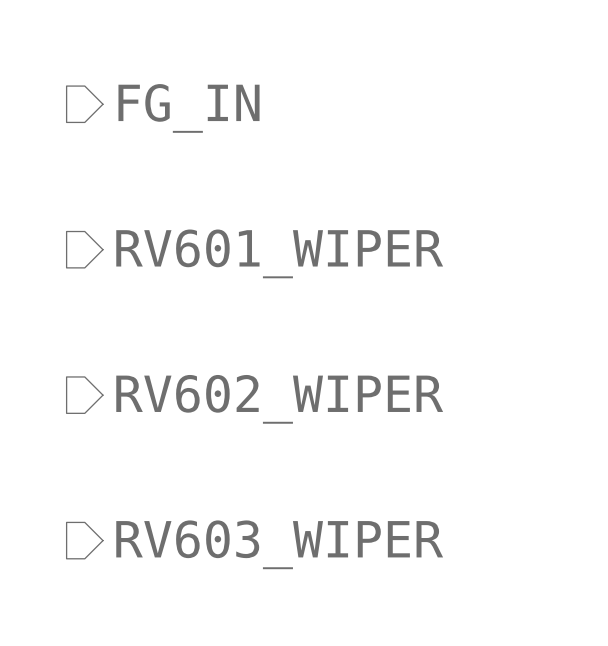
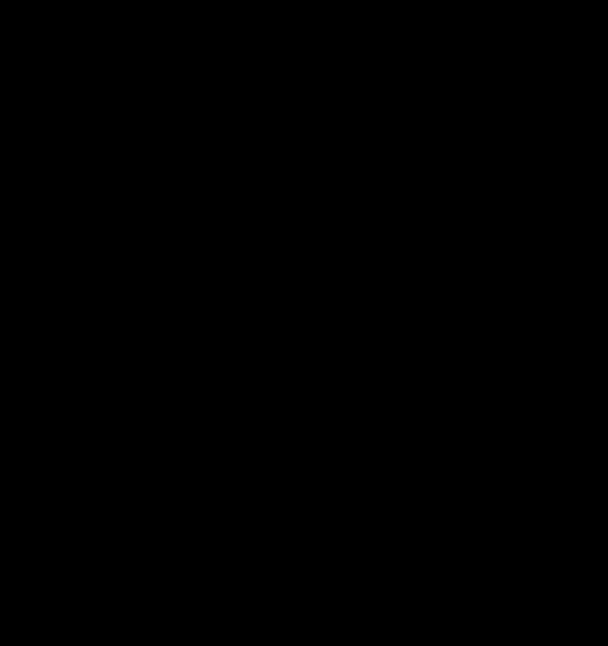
hierarchical label: FG_IN (189, 108) -> none
hierarchical label: RV601_WIPER (279, 253) -> none
hierarchical label: RV602_WIPER (279, 399) -> none
hierarchical label: RV603_WIPER (279, 544) -> none

